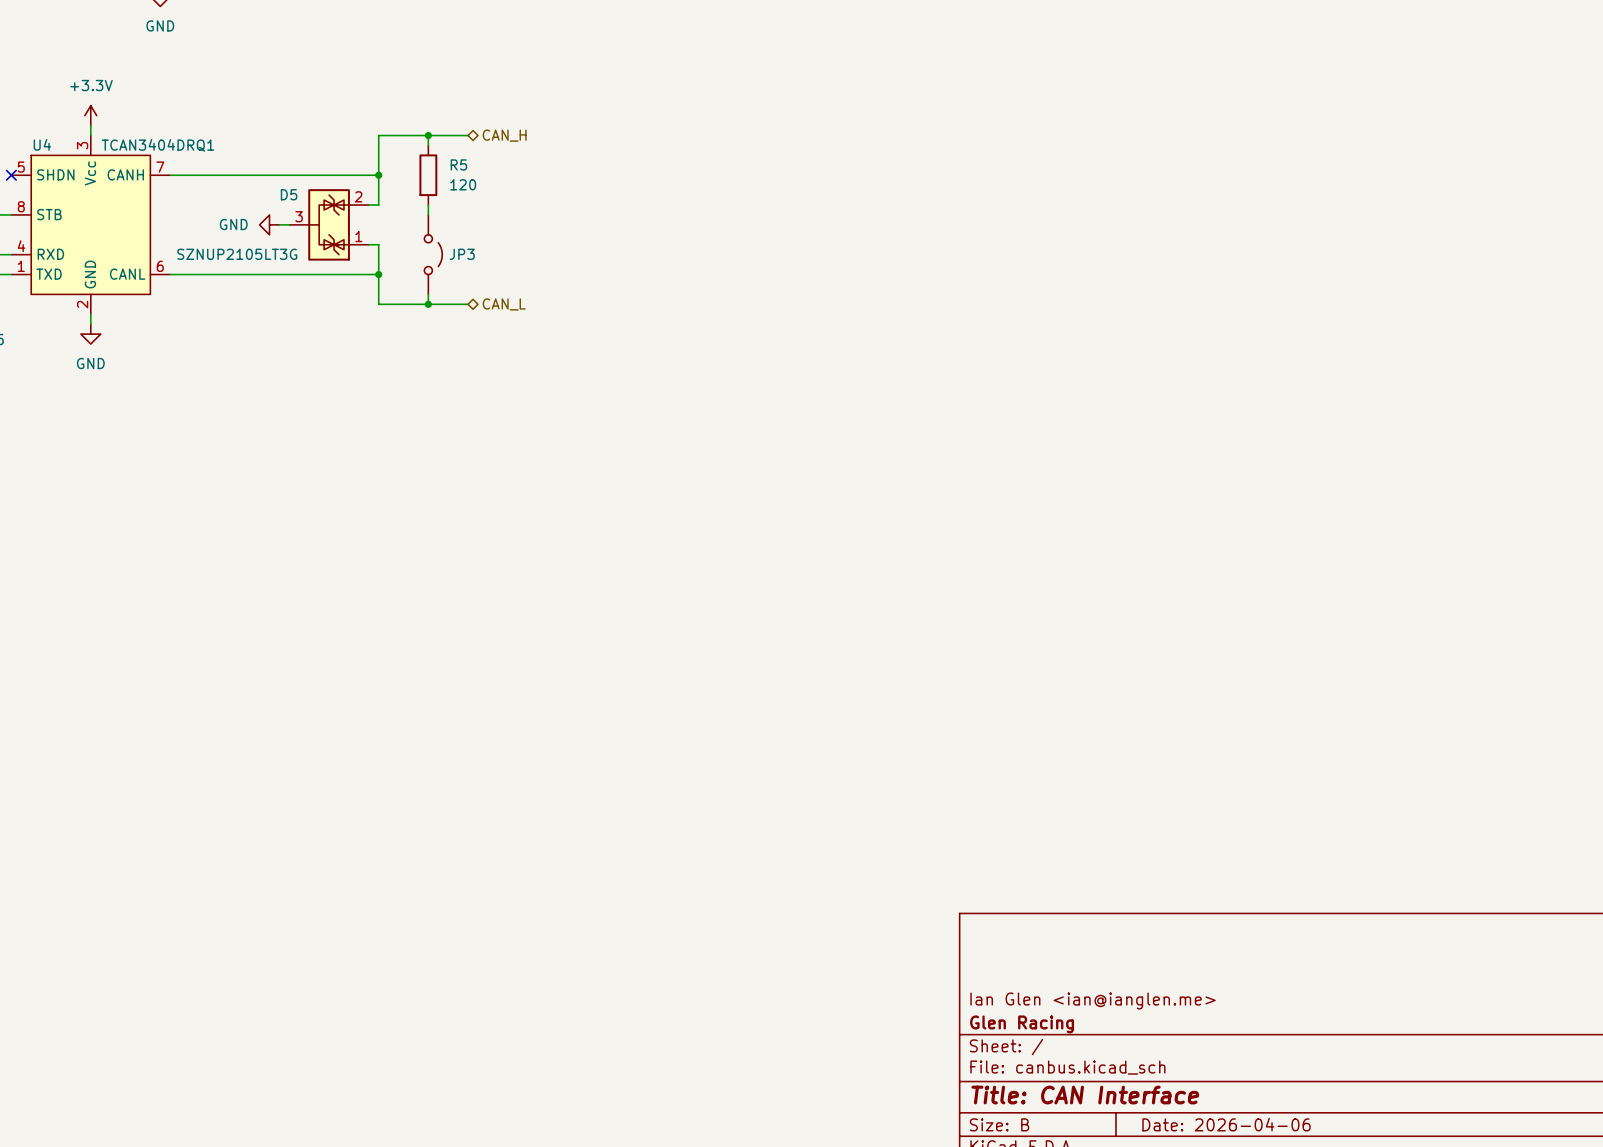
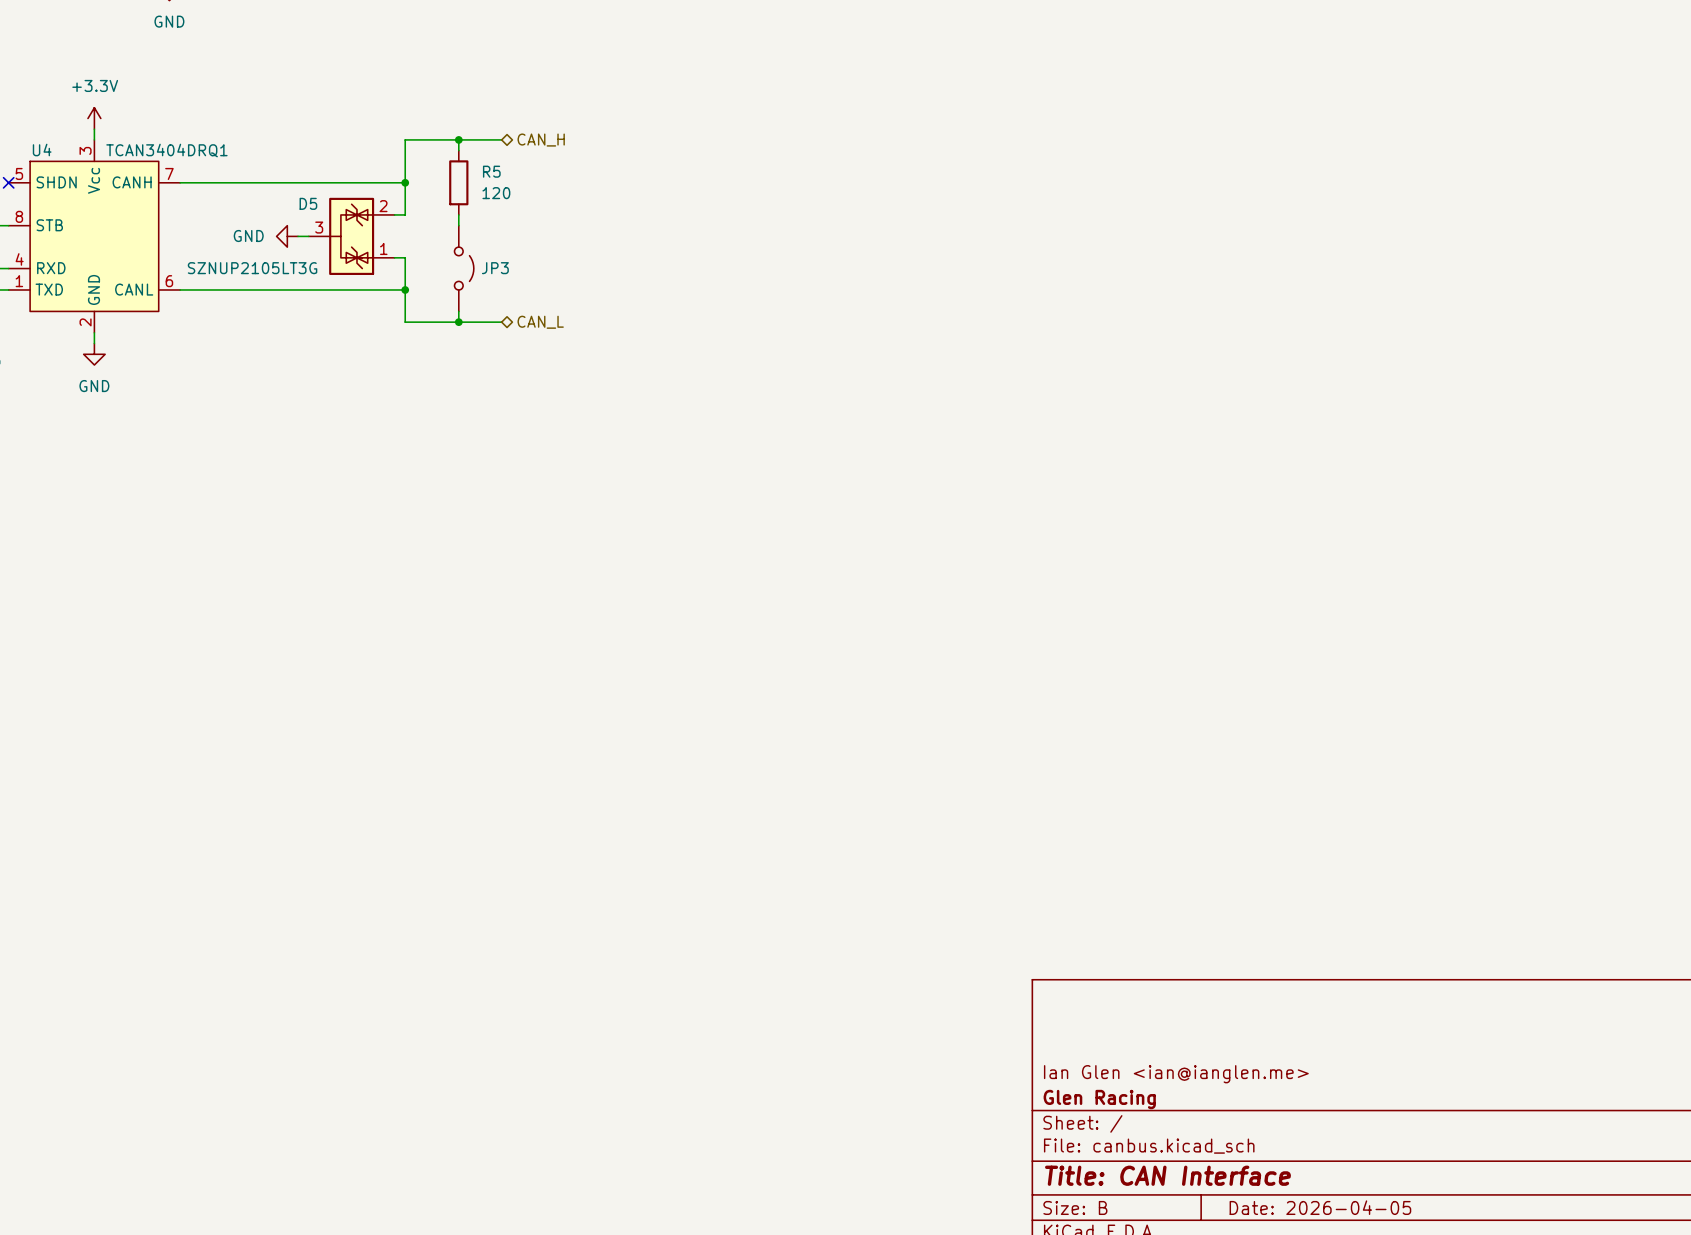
title block: Date: 2026-04-06 (1226, 1124) -> Date: 2026-04-05 (1320, 1207)

